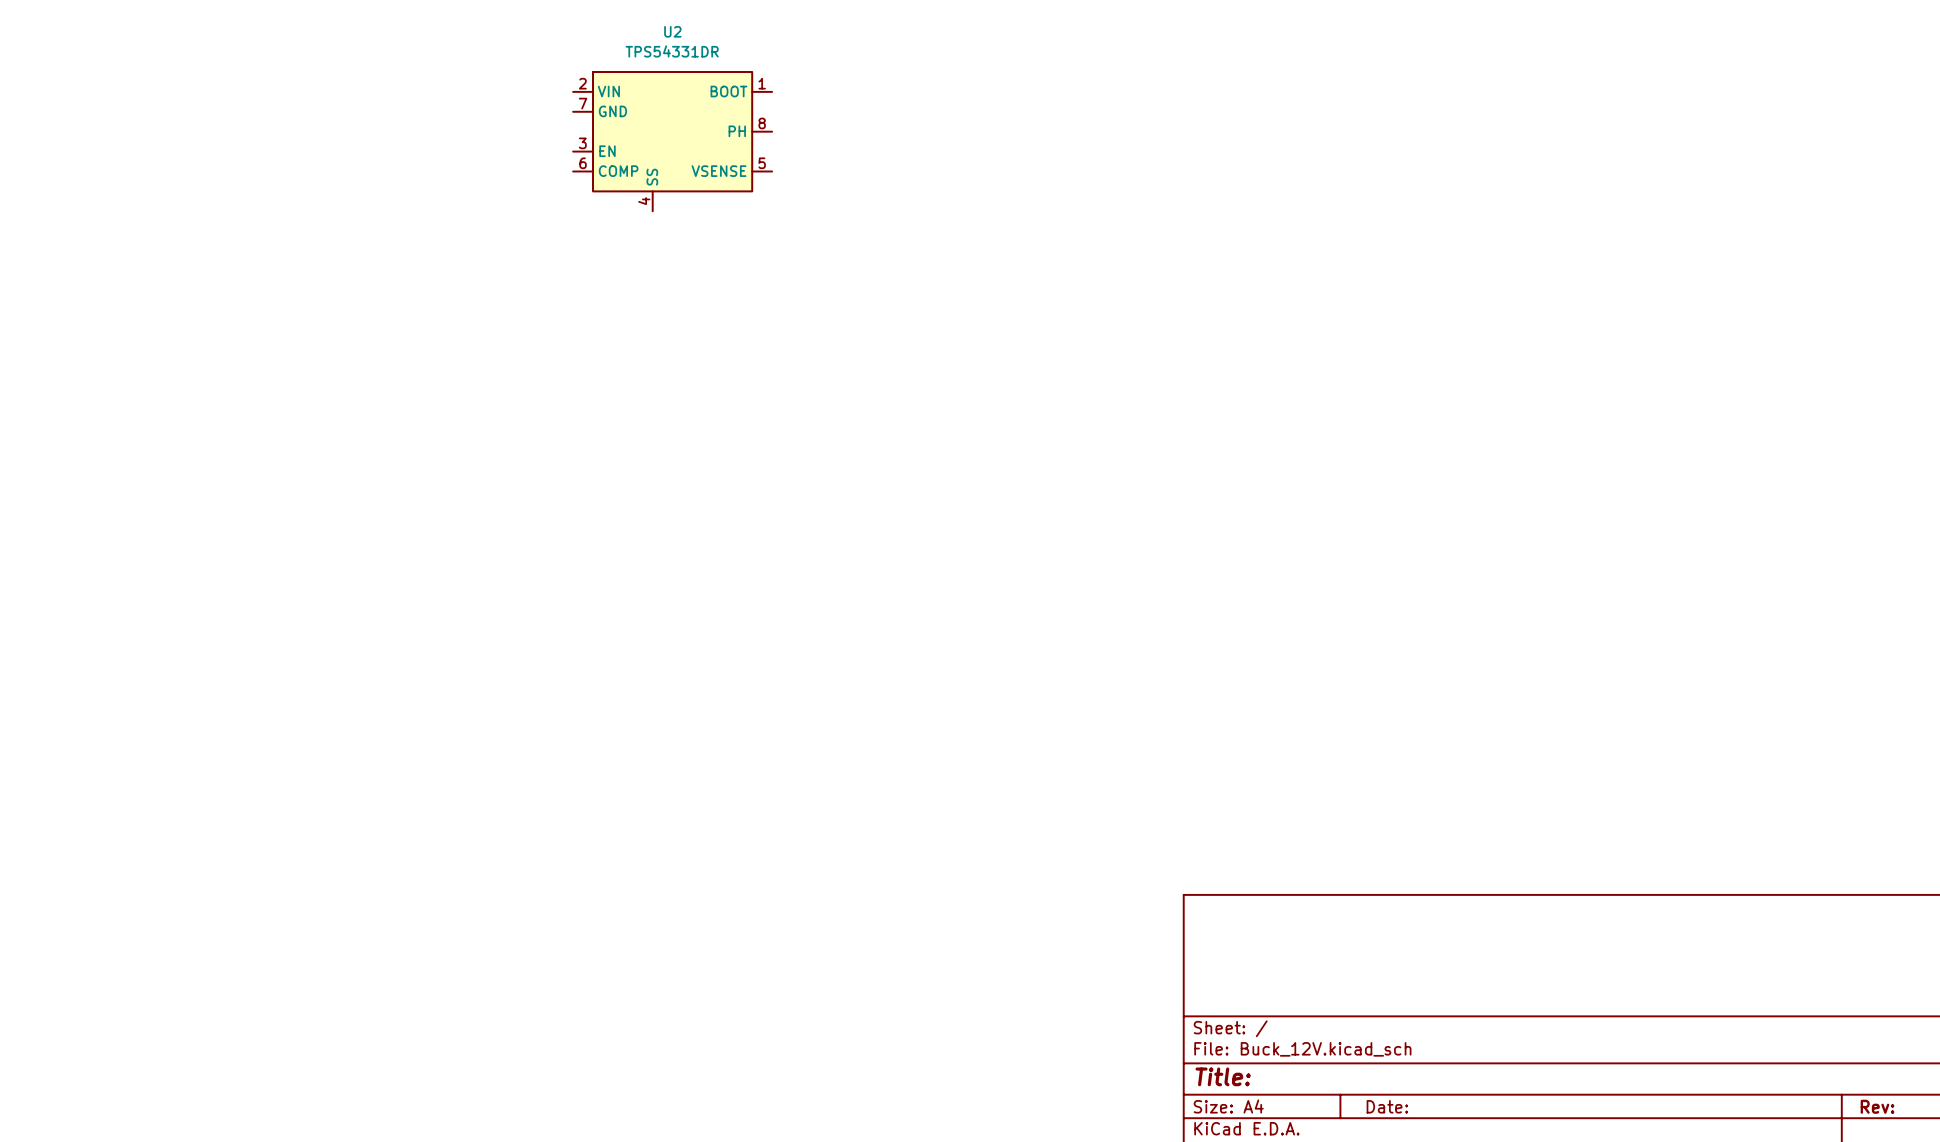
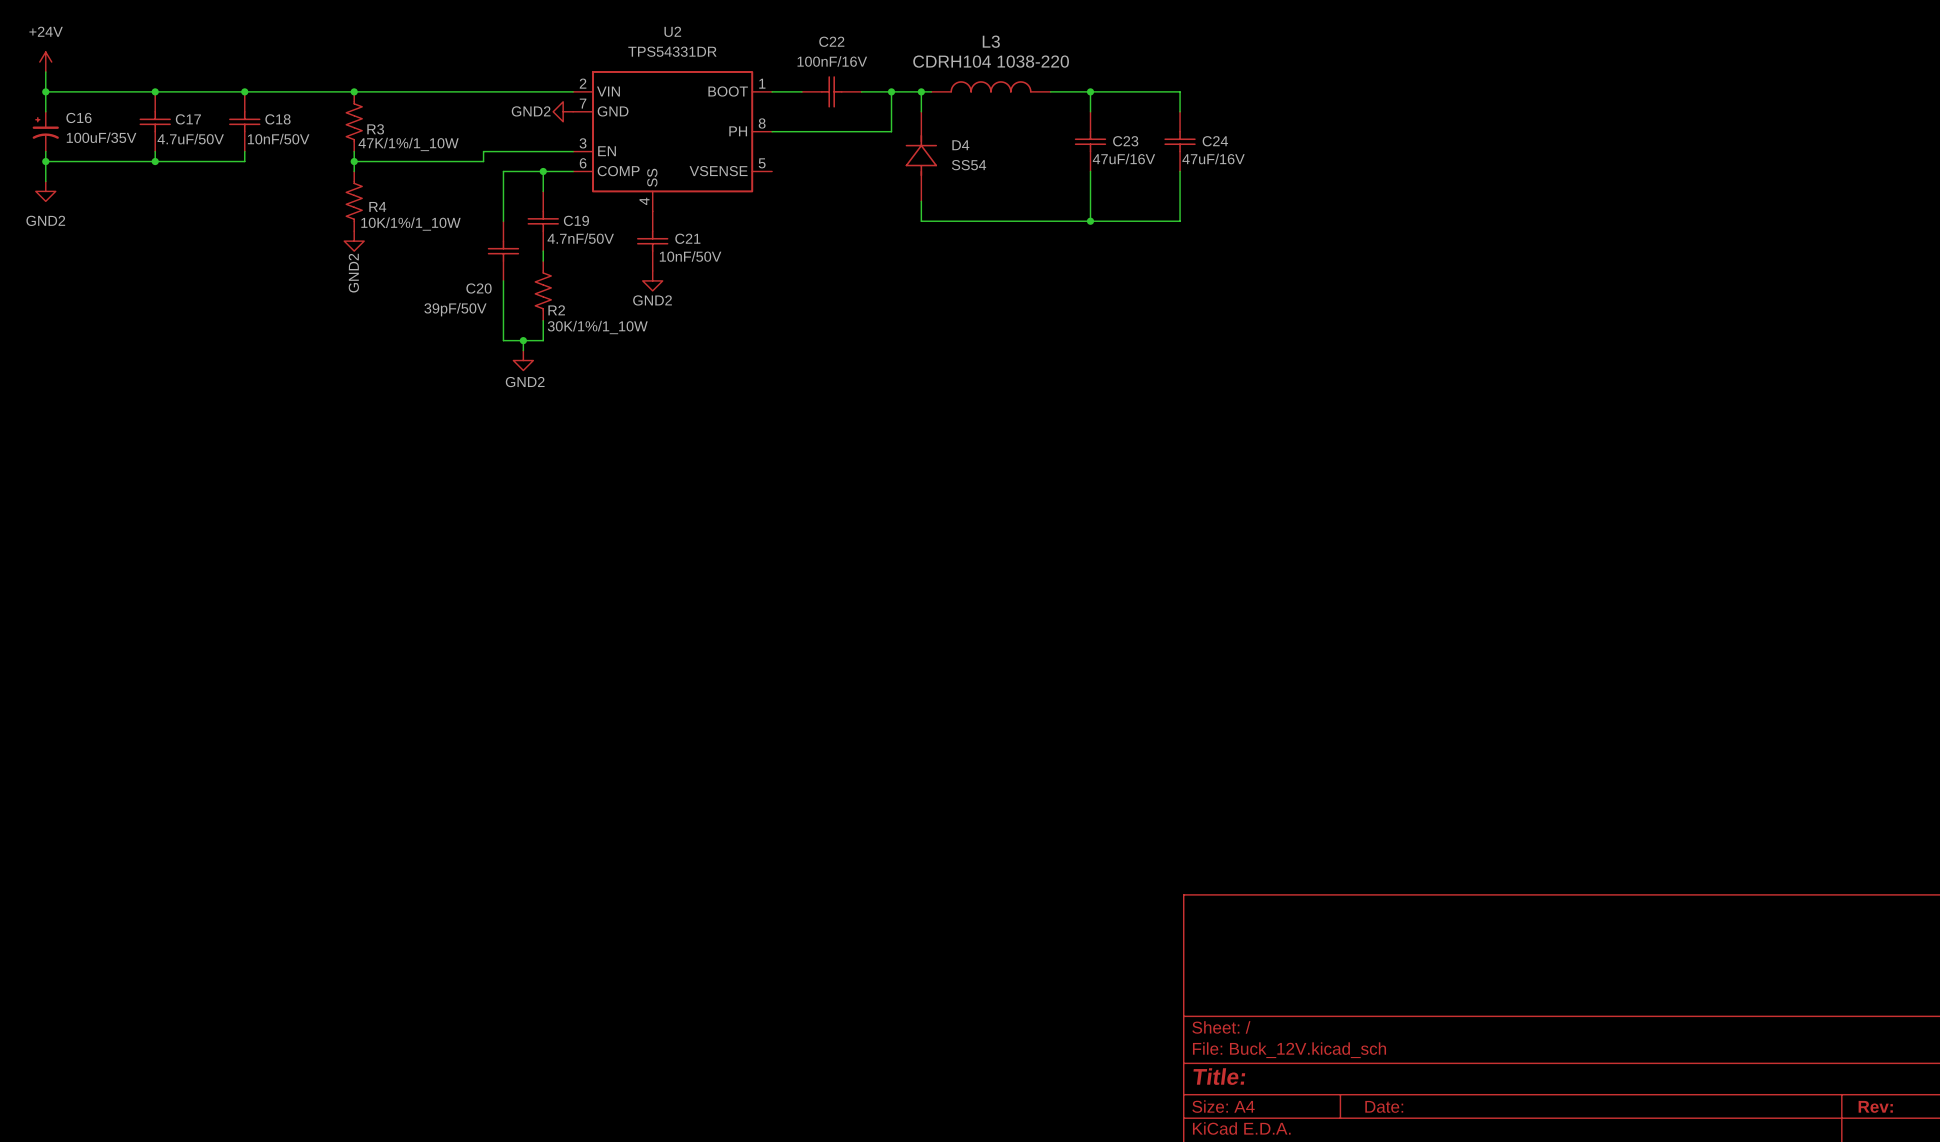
power symbol: none -> +24V (45, 62)
wire: none -> (45, 71) (45, 111)
L3: none -> CDRH104 1038-220 (990, 86)
wire: none -> (45, 91) (573, 91)
junction: none -> (45, 91)
junction: none -> (155, 91)
junction: none -> (244, 91)
junction: none -> (354, 91)
wire: none -> (772, 91) (801, 91)
C22: none -> 100nF/16V (831, 91)
wire: none -> (861, 91) (931, 91)
wire: none -> (891, 91) (891, 131) (772, 131)
junction: none -> (891, 91)
wire: none -> (921, 91) (921, 111)
junction: none -> (921, 91)
wire: none -> (1050, 91) (1180, 91) (1180, 111)
wire: none -> (1090, 91) (1090, 111)
junction: none -> (1090, 91)
power symbol: none -> GND2 (563, 111)
C17: none -> 4.7uF/50V (155, 121)
C18: none -> 10nF/50V (244, 121)
R3: none -> 47K/1%/1_10W (354, 121)
C16: none -> 100uF/35V (45, 131)
C23: none -> 47uF/16V (1090, 141)
C24: none -> 47uF/16V (1180, 141)
wire: none -> (45, 151) (45, 181)
wire: none -> (155, 151) (155, 161)
wire: none -> (244, 151) (244, 161) (45, 161)
wire: none -> (354, 151) (354, 171)
wire: none -> (573, 151) (483, 151) (483, 161) (354, 161)
D4: none -> SS54 (921, 156)
junction: none -> (45, 161)
junction: none -> (155, 161)
junction: none -> (354, 161)
wire: none -> (543, 171) (543, 191)
junction: none -> (543, 171)
wire: none -> (573, 171) (503, 171) (503, 221)
wire: none -> (1090, 171) (1090, 221)
wire: none -> (1180, 171) (1180, 221) (921, 221) (921, 201)
power symbol: none -> GND2 (45, 191)
R4: none -> 10K/1%/1_10W (354, 201)
C19: none -> 4.7nF/50V (543, 221)
junction: none -> (1090, 221)
power symbol: none -> GND2 (354, 241)
C21: none -> 10nF/50V (652, 241)
C20: none -> 39pF/50V (503, 251)
wire: none -> (543, 251) (543, 261)
wire: none -> (503, 280) (503, 340) (543, 340) (543, 320)
power symbol: none -> GND2 (652, 280)
R2: none -> 30K/1%/1_10W (543, 290)
wire: none -> (523, 340) (523, 350)
junction: none -> (523, 340)
power symbol: none -> GND2 (523, 360)

